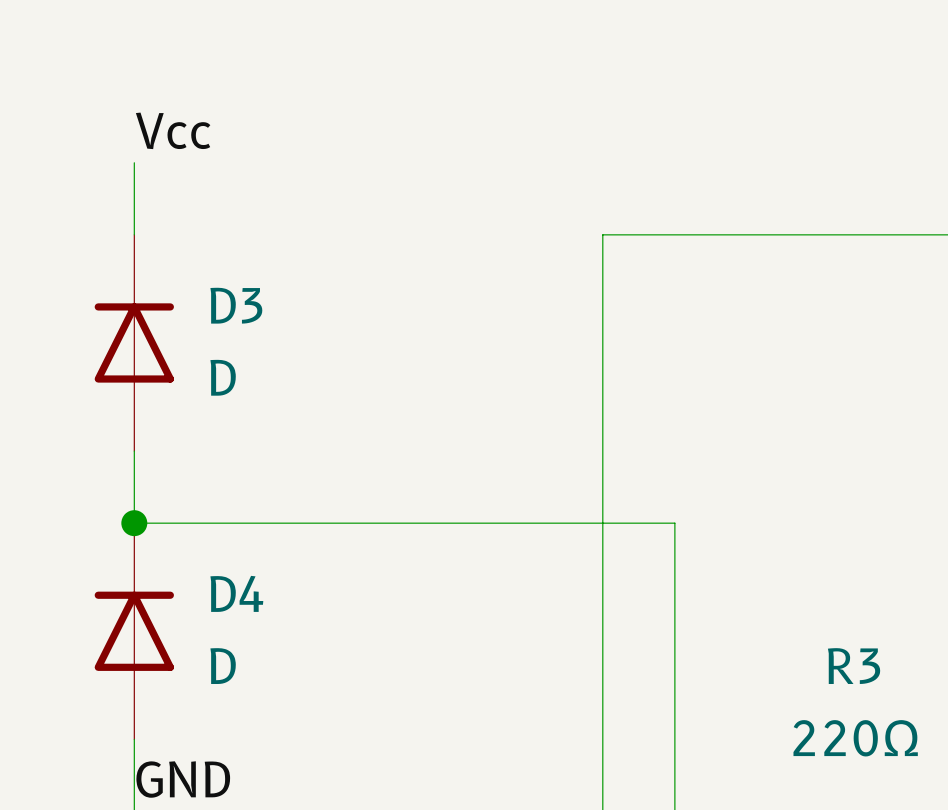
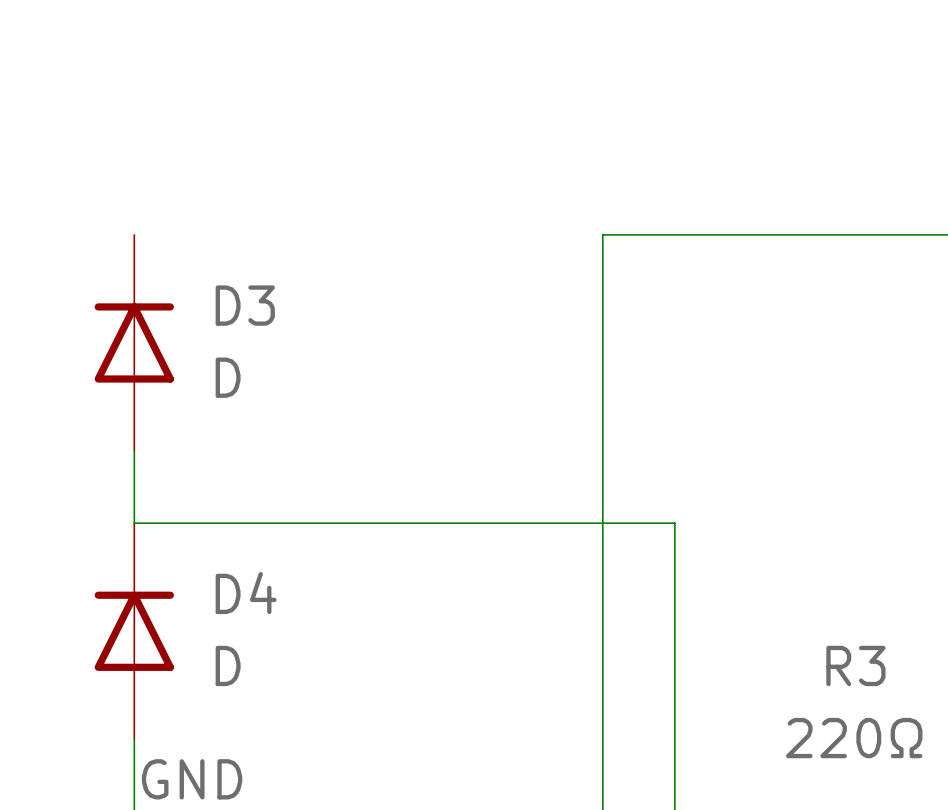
label: Vcc (173, 130) -> none
wire: (134, 162) (134, 234) -> none
junction: (134, 523) -> none

